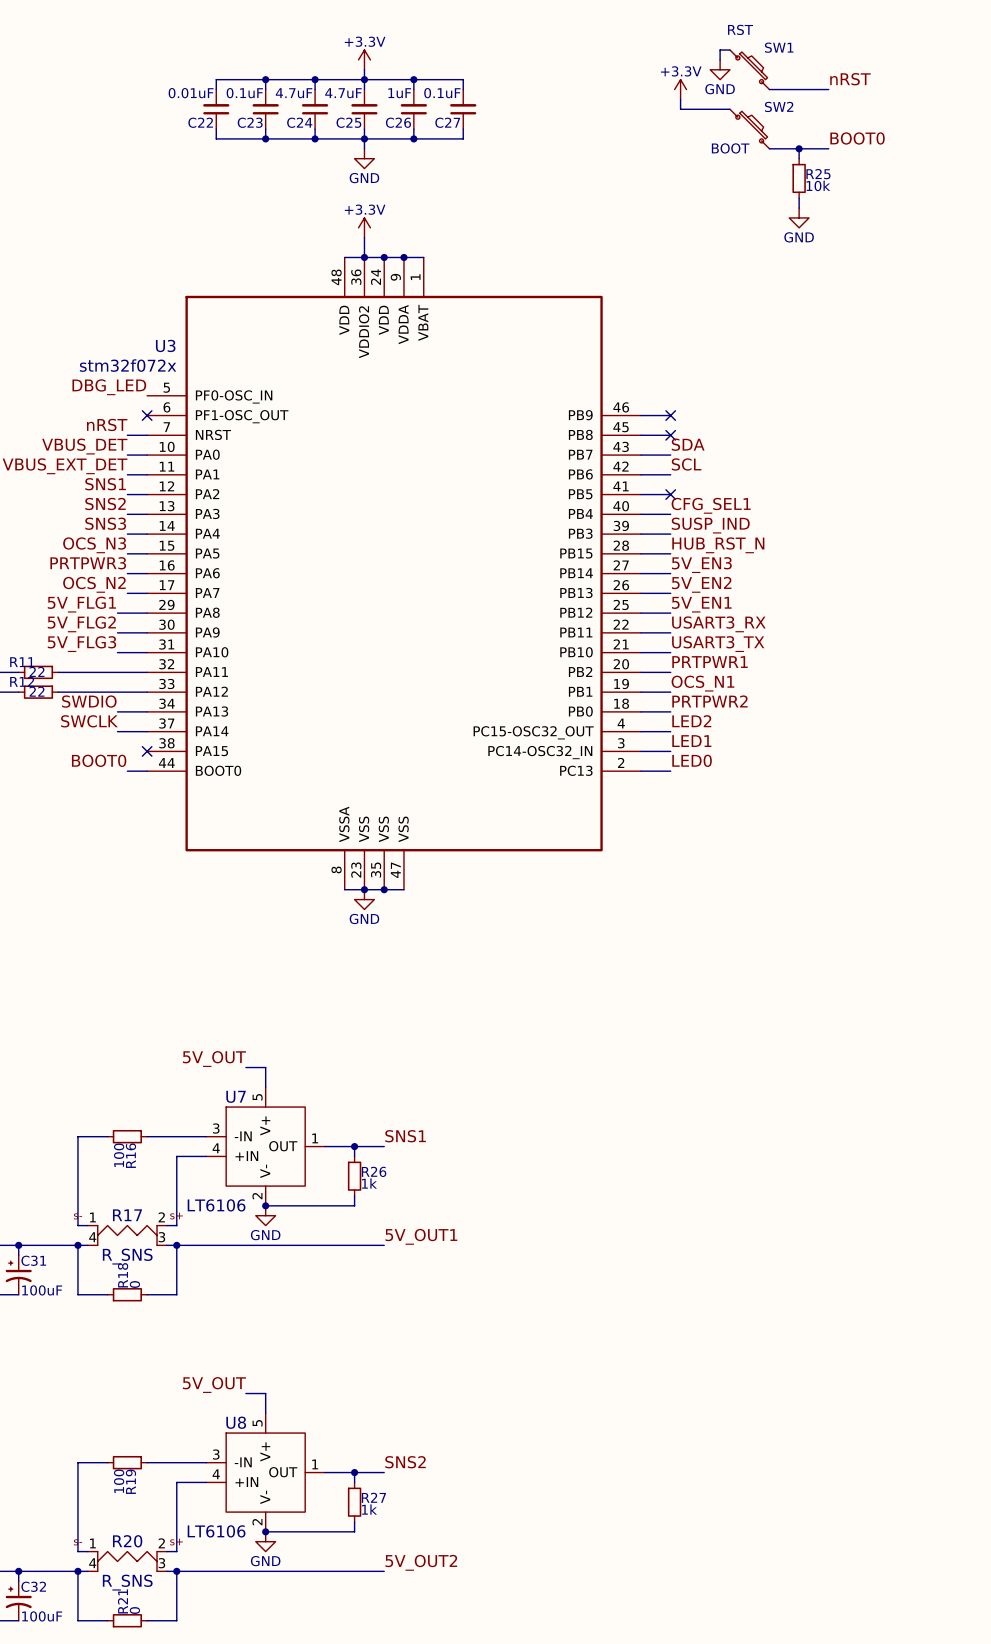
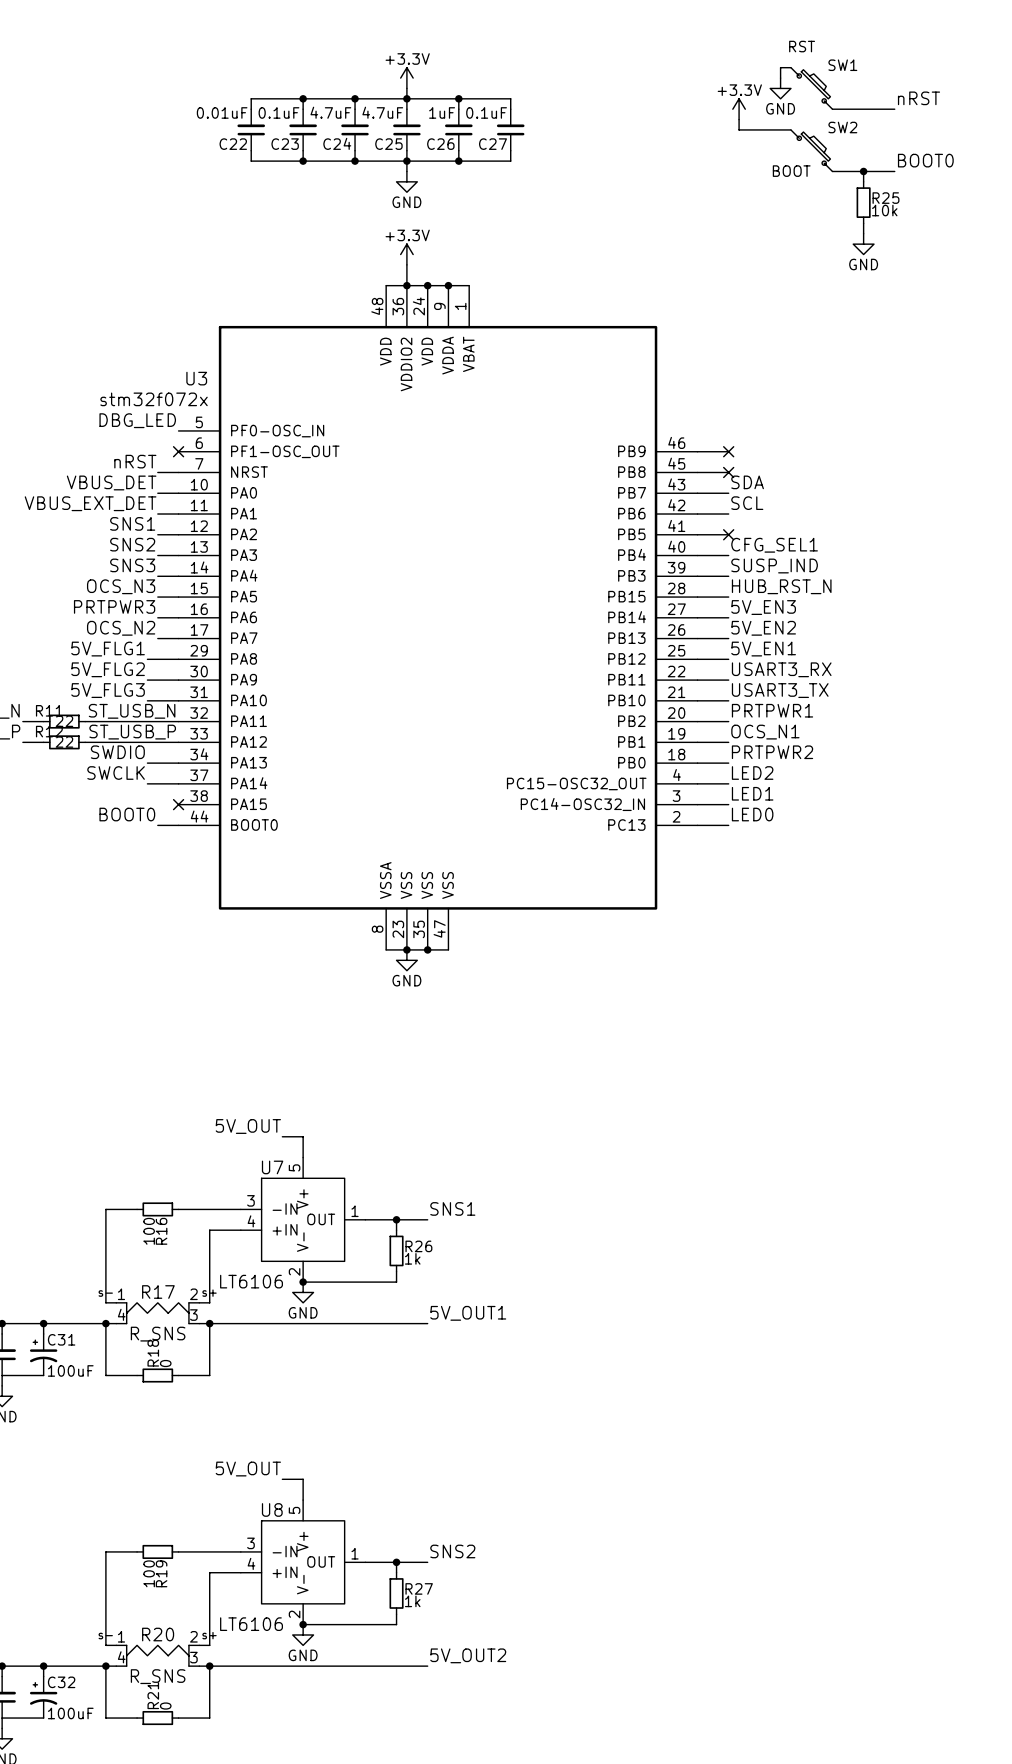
label: none -> ST_USB_N (132, 711)
label: none -> ST_USB_P (132, 732)

